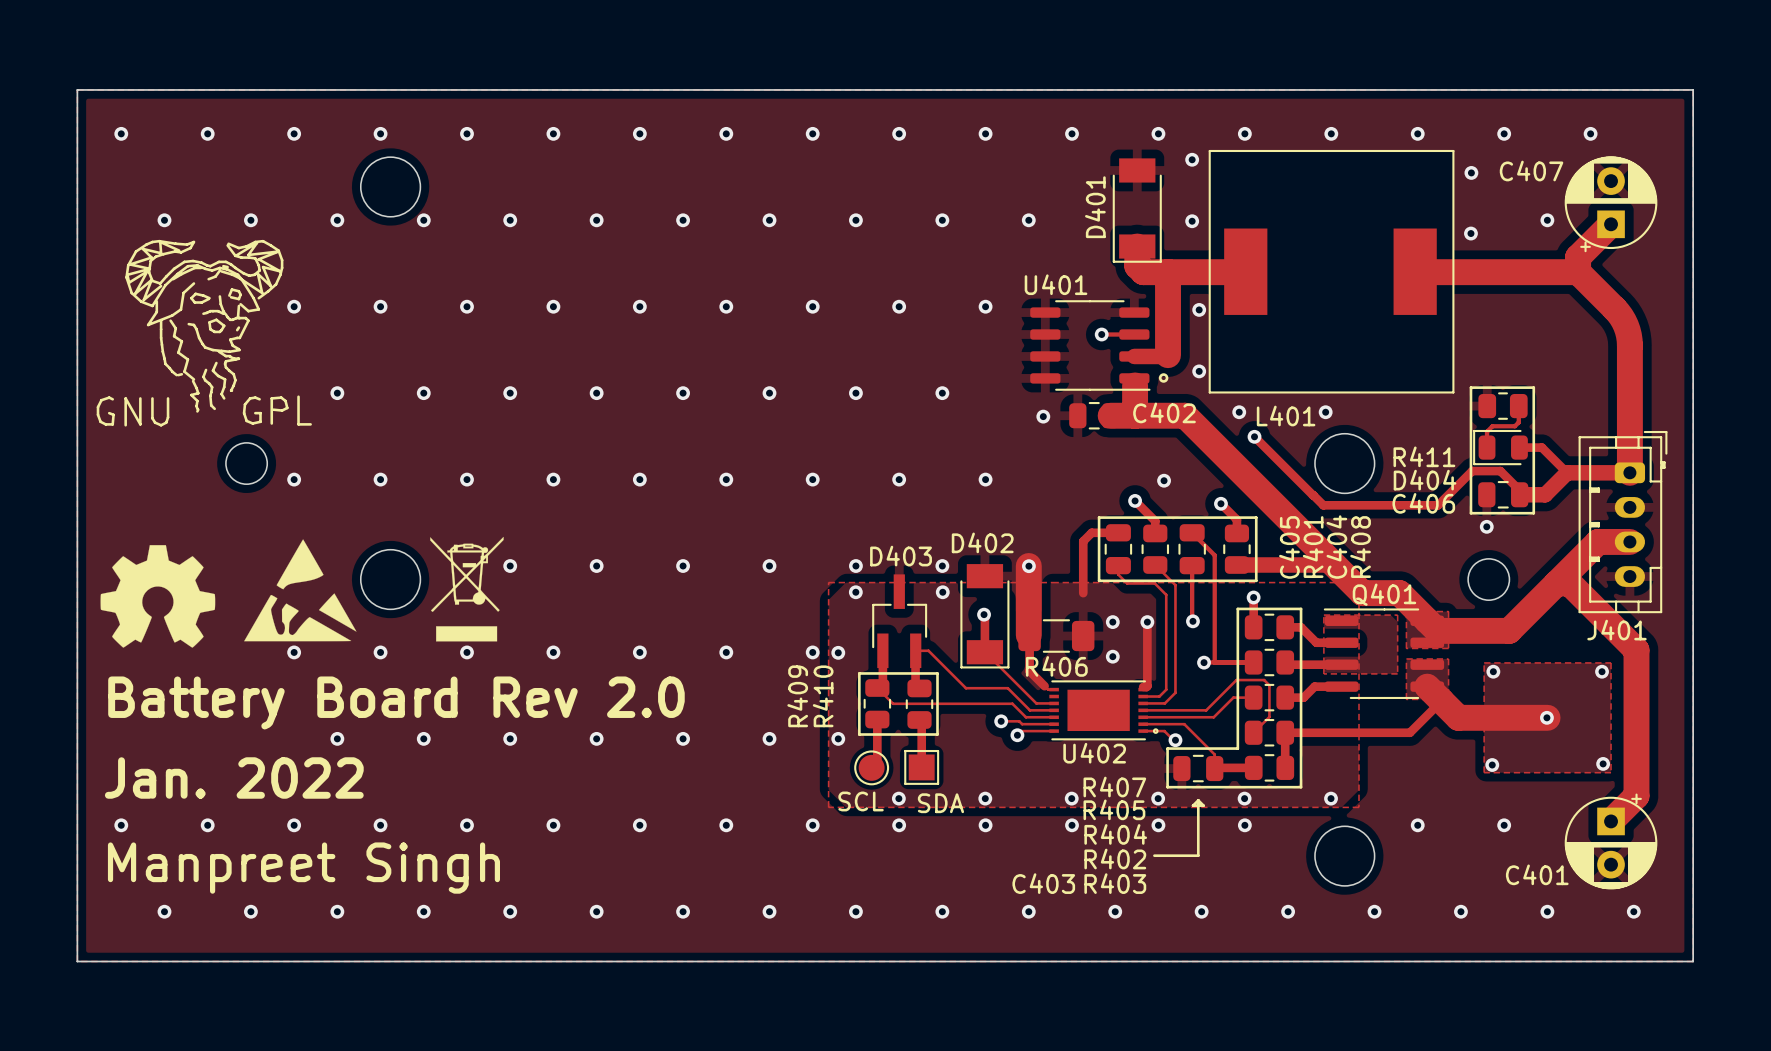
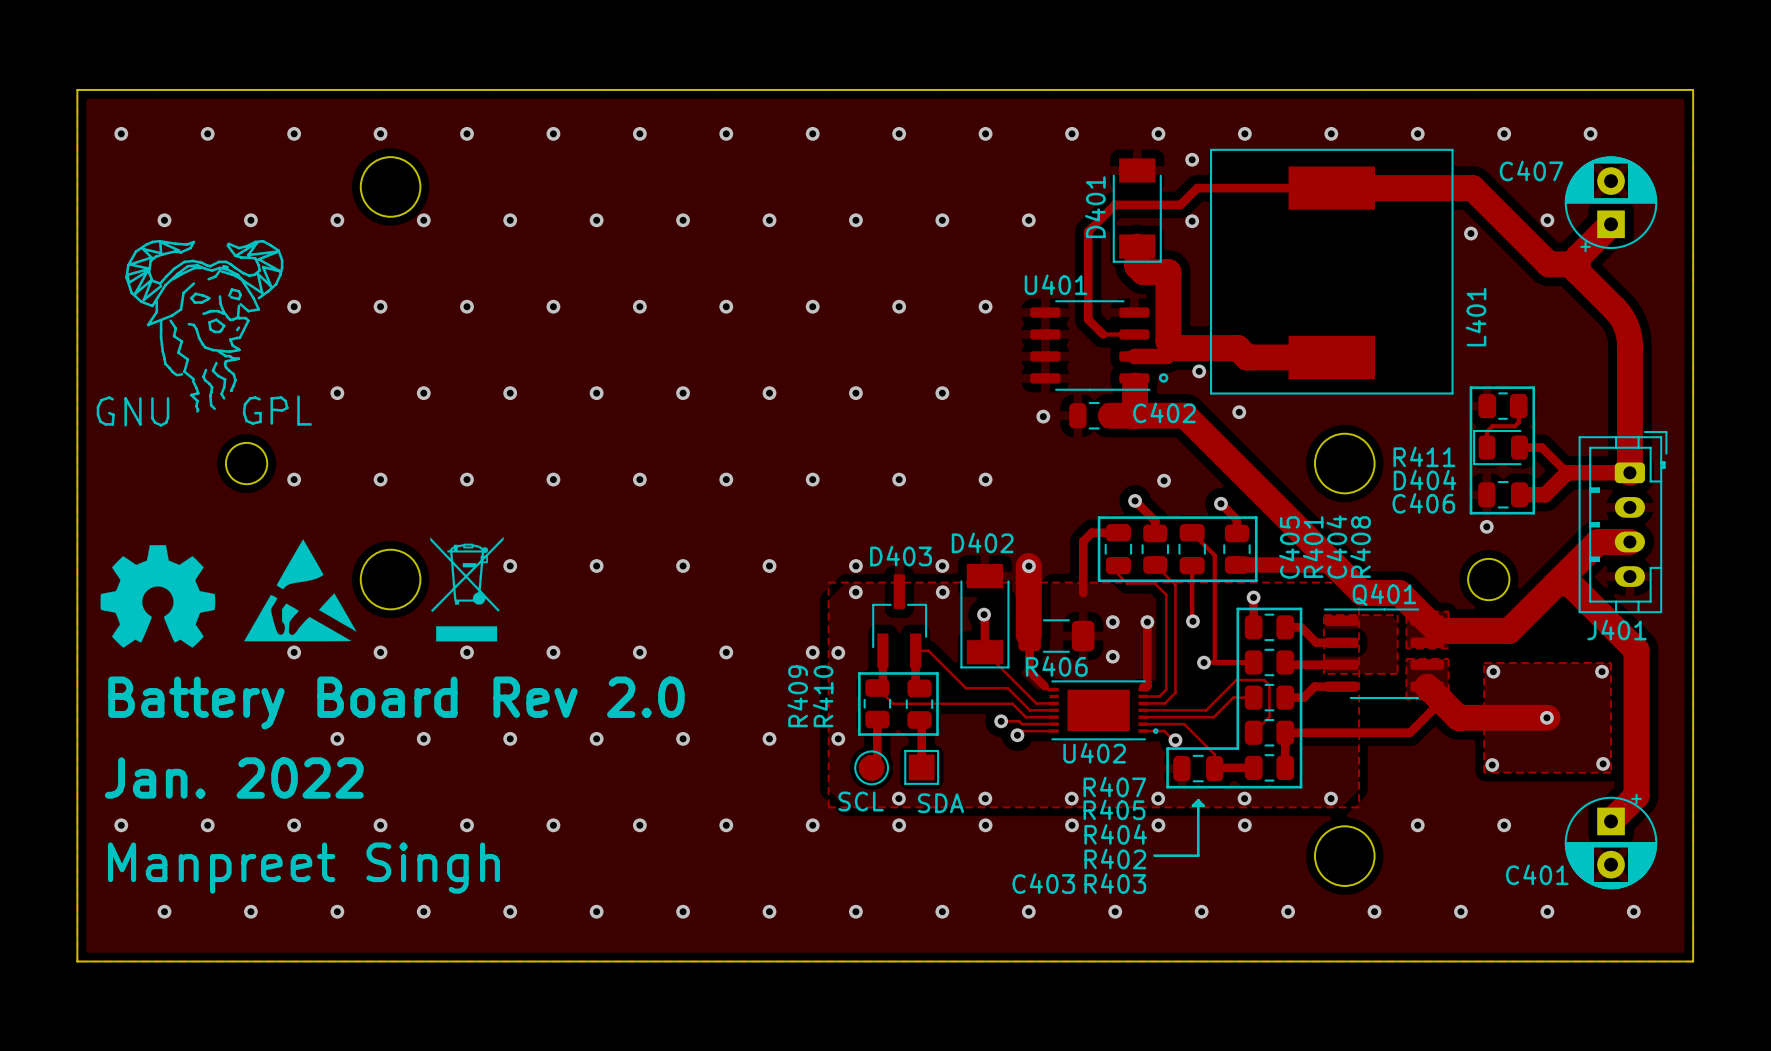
via: (1471, 172) -> none
track: (1245, 271) (1168, 272) (1168, 355) -> none
L401 rotation: 0° (1331, 271) -> 90° counterclockwise (1331, 271)
track: (1415, 271) (1578, 272) -> (1103, 334) (1088, 319) (1088, 231) (1115, 204) (1180, 204) (1197, 188) (1472, 188) (1548, 264) (1570, 264) (1578, 272)
track: none -> (1168, 272) (1168, 341) (1175, 348) (1237, 348) (1247, 357) (1331, 357)
via: (1199, 309) -> none
via: (1101, 334) -> none
via: (1325, 412) -> none
track: (1254, 436) (1323, 505) (1438, 505) (1472, 471) (1500, 471) (1519, 490) (1519, 494) -> none
via: (1254, 436) -> none

